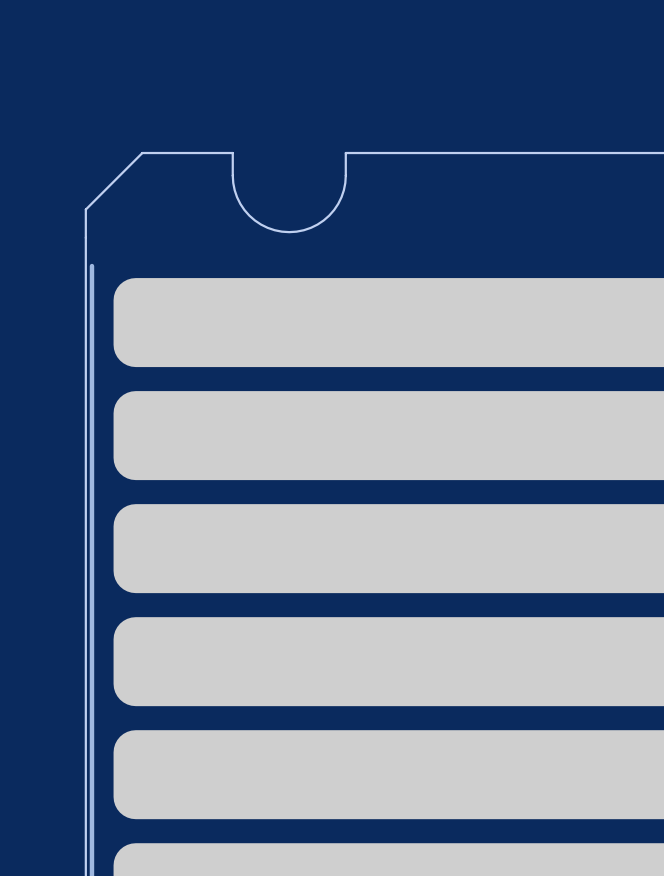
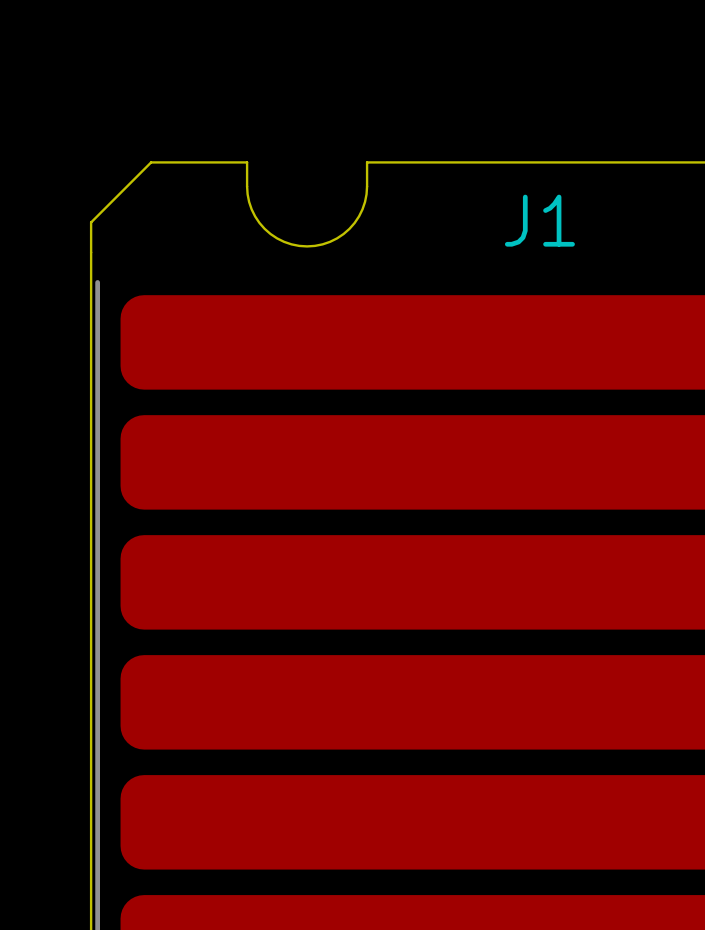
J1 name: none -> J1 (539, 220)

